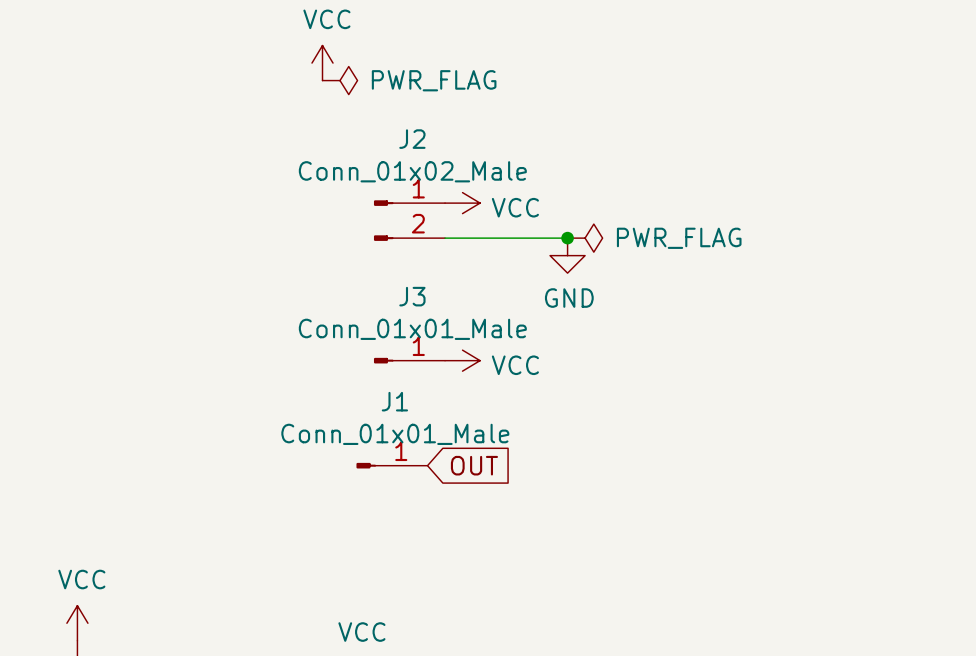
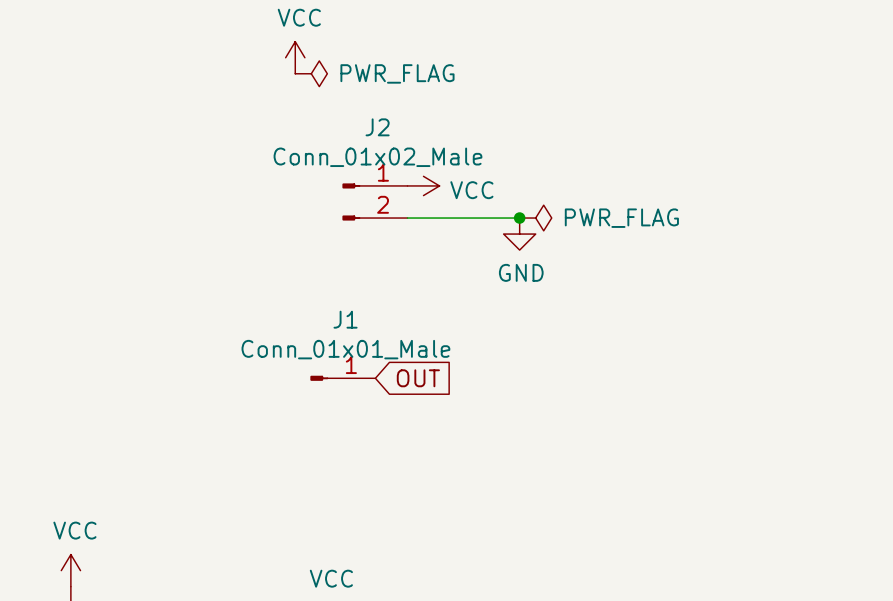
J3: Conn_01x01_Male (409, 360) -> none
power symbol: VCC (462, 360) -> none
J1 position: (391, 465) -> (342, 378)
global label position: OUT (474, 465) -> OUT (418, 378)

